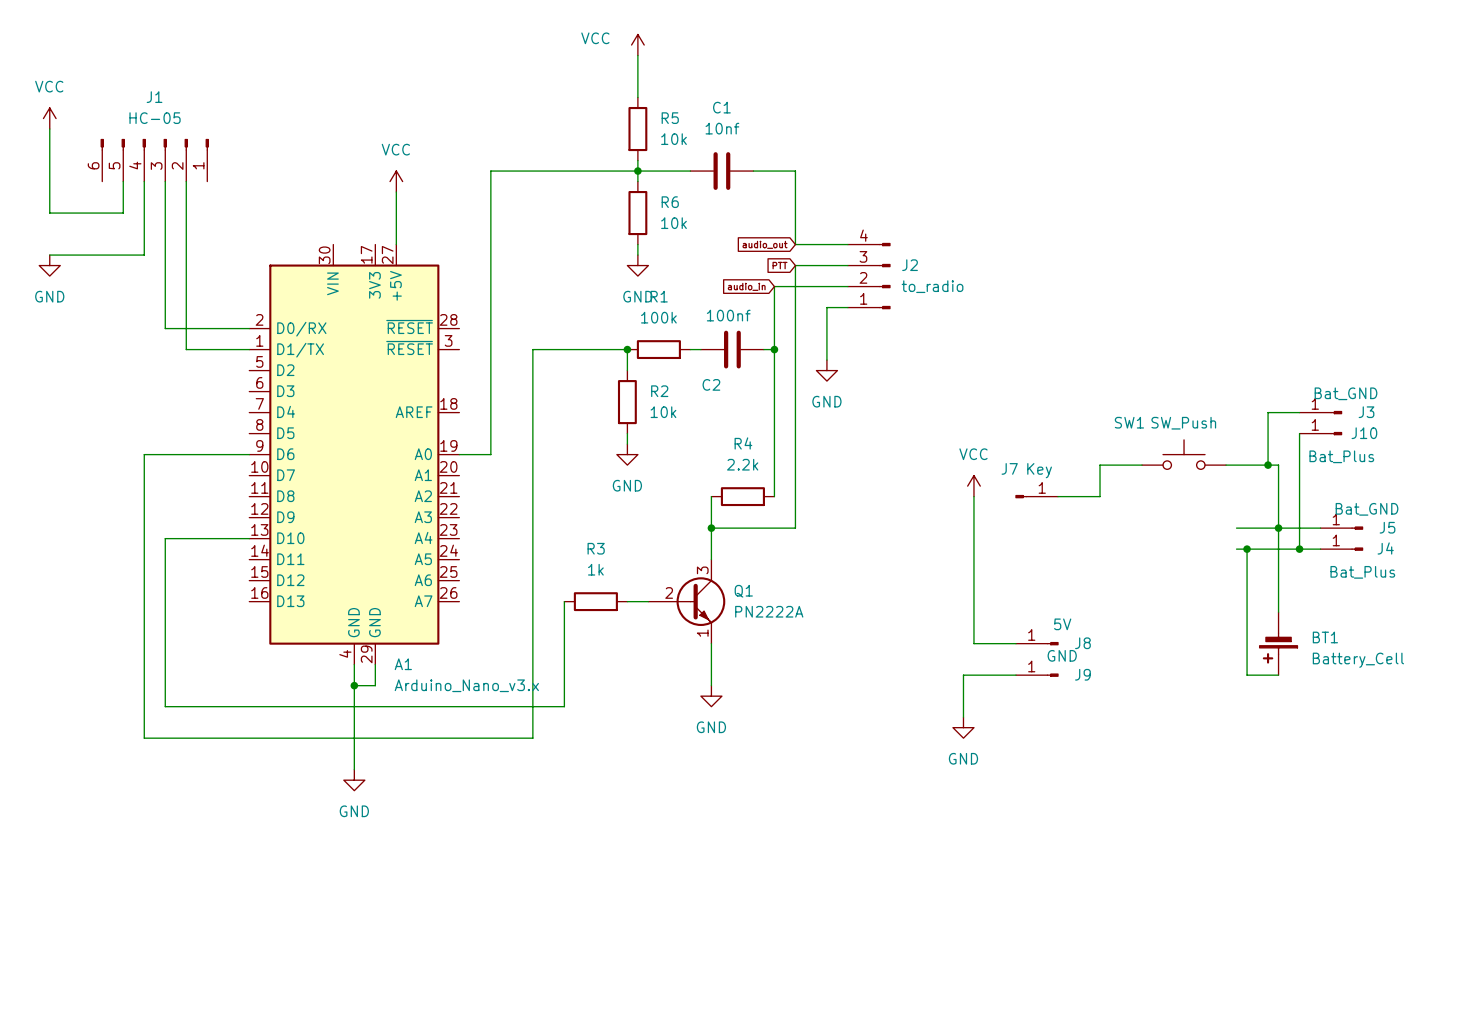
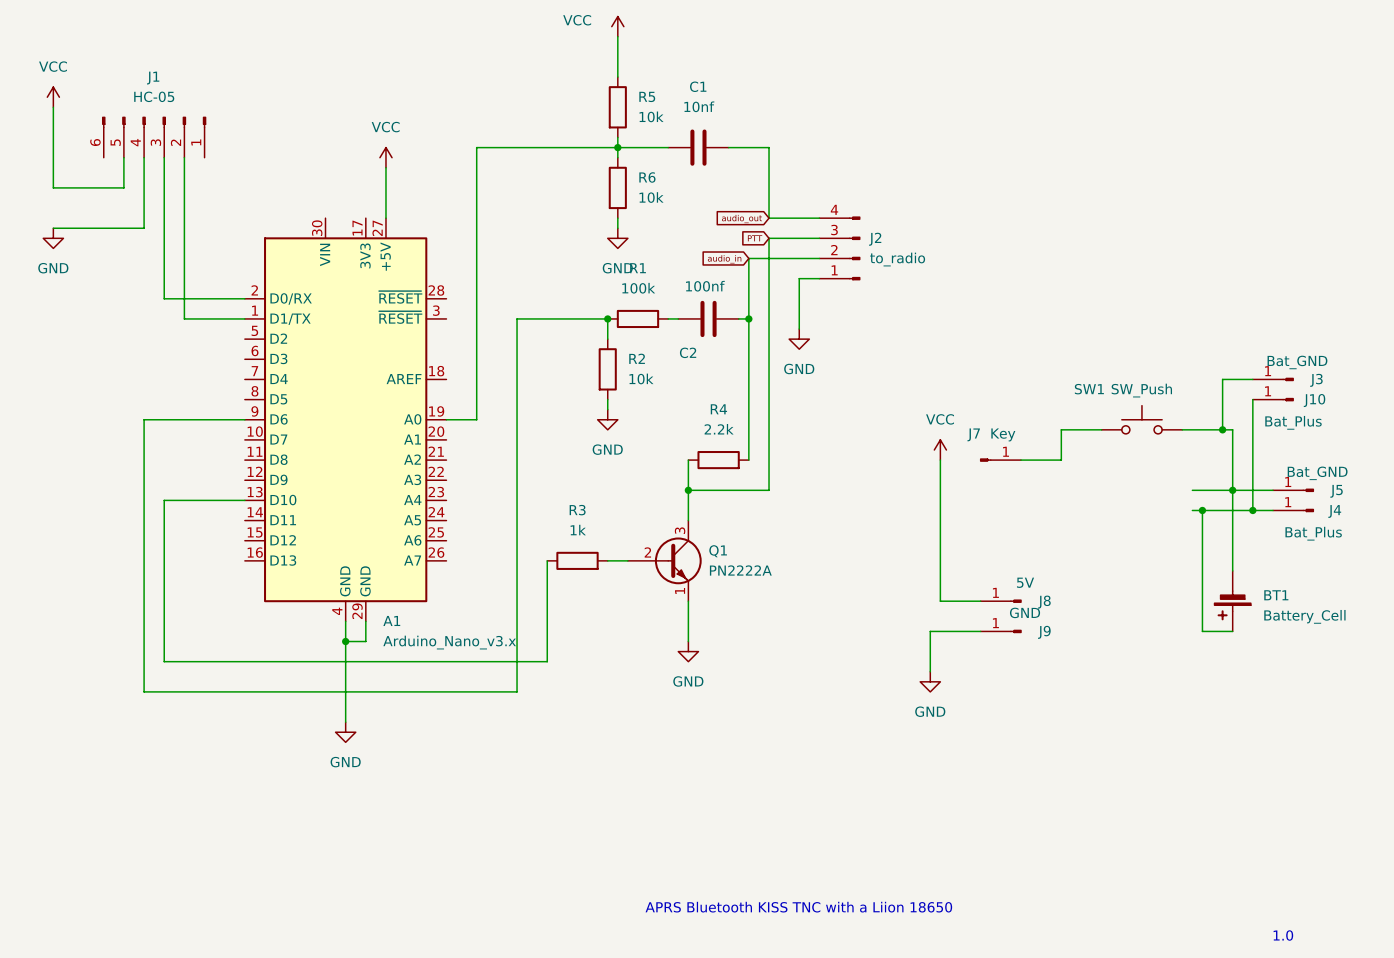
text: none -> APRS Bluetooth KISS TNC with a Liion 18650 (798, 907)
text: none -> 1.0 (1283, 935)

